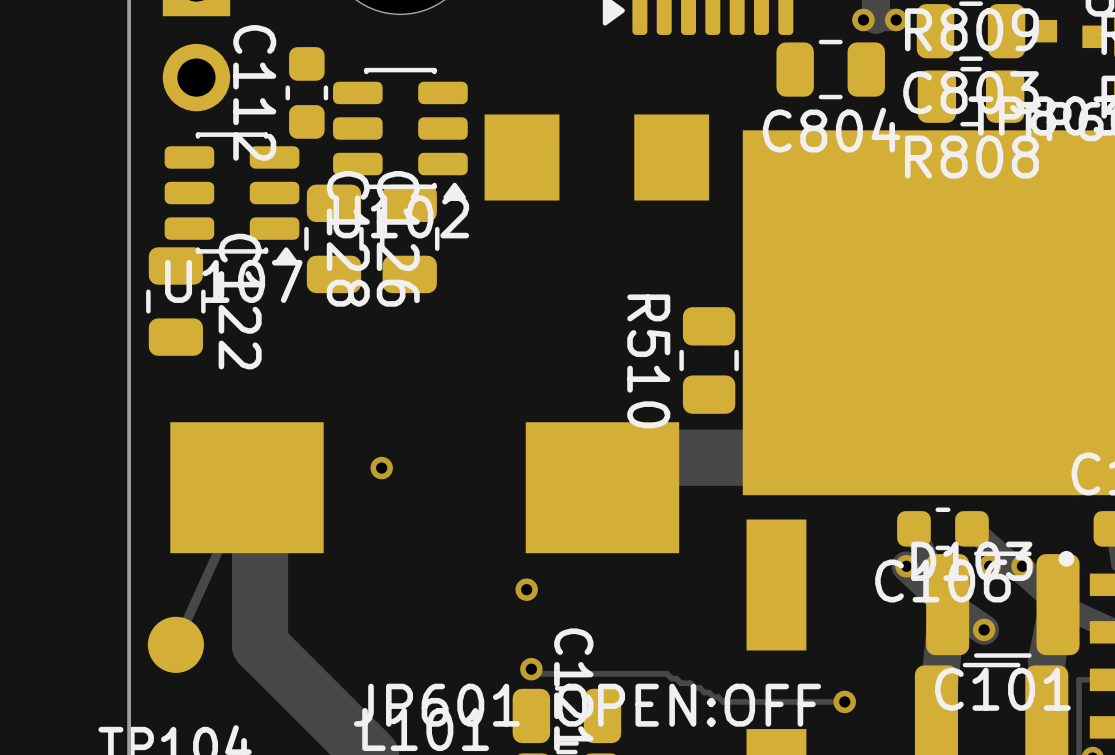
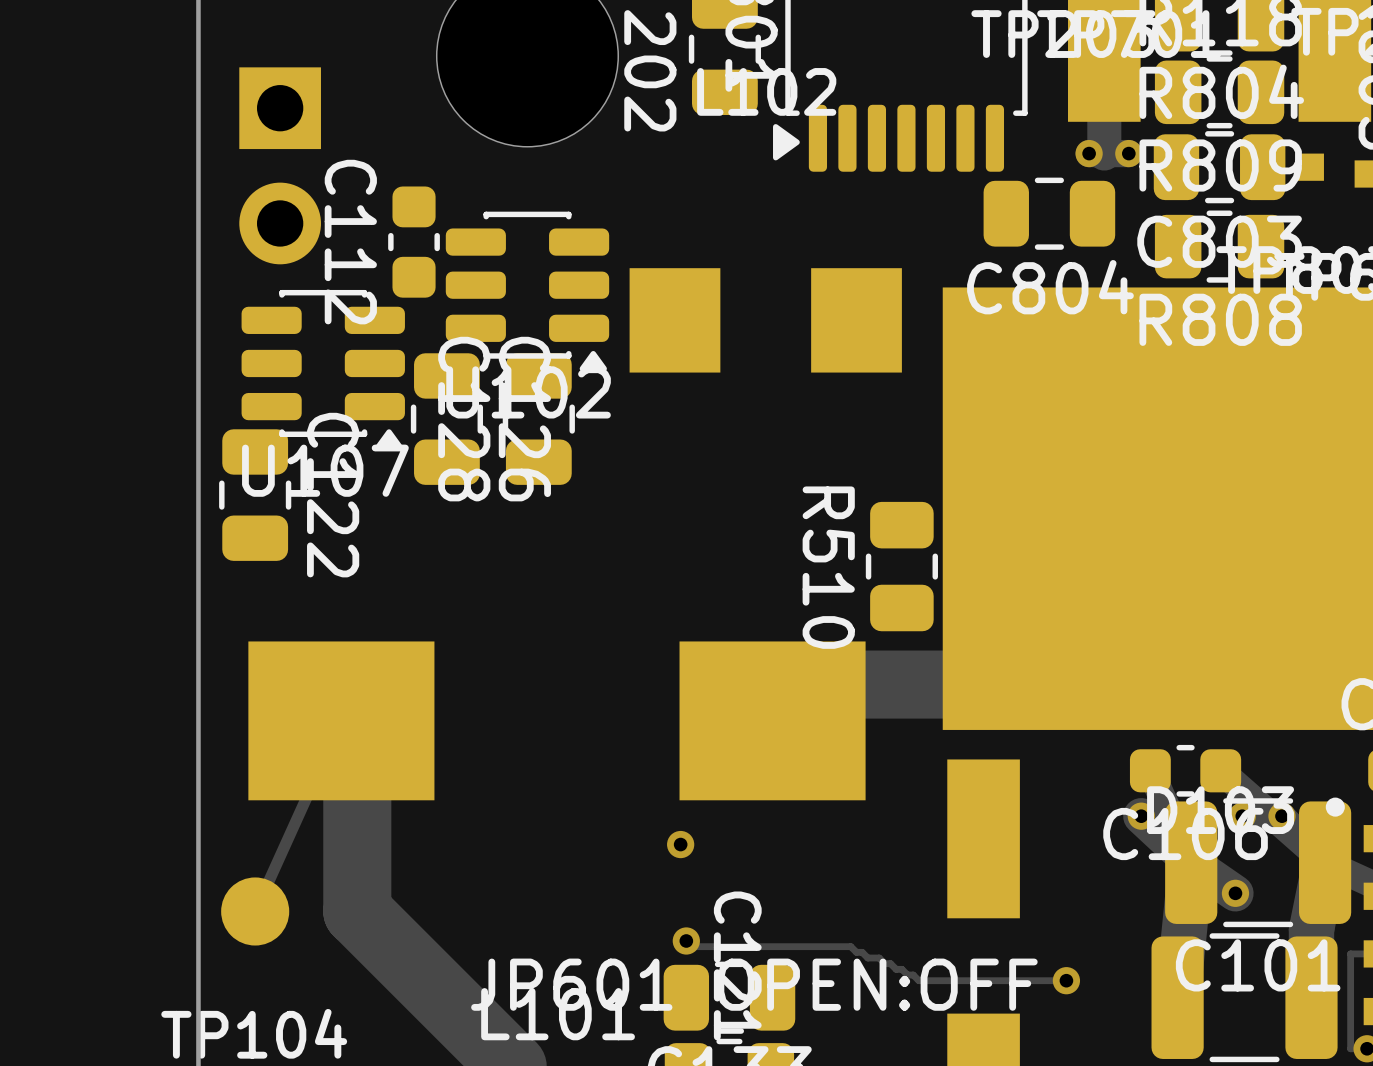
via: (381, 468) -> none

